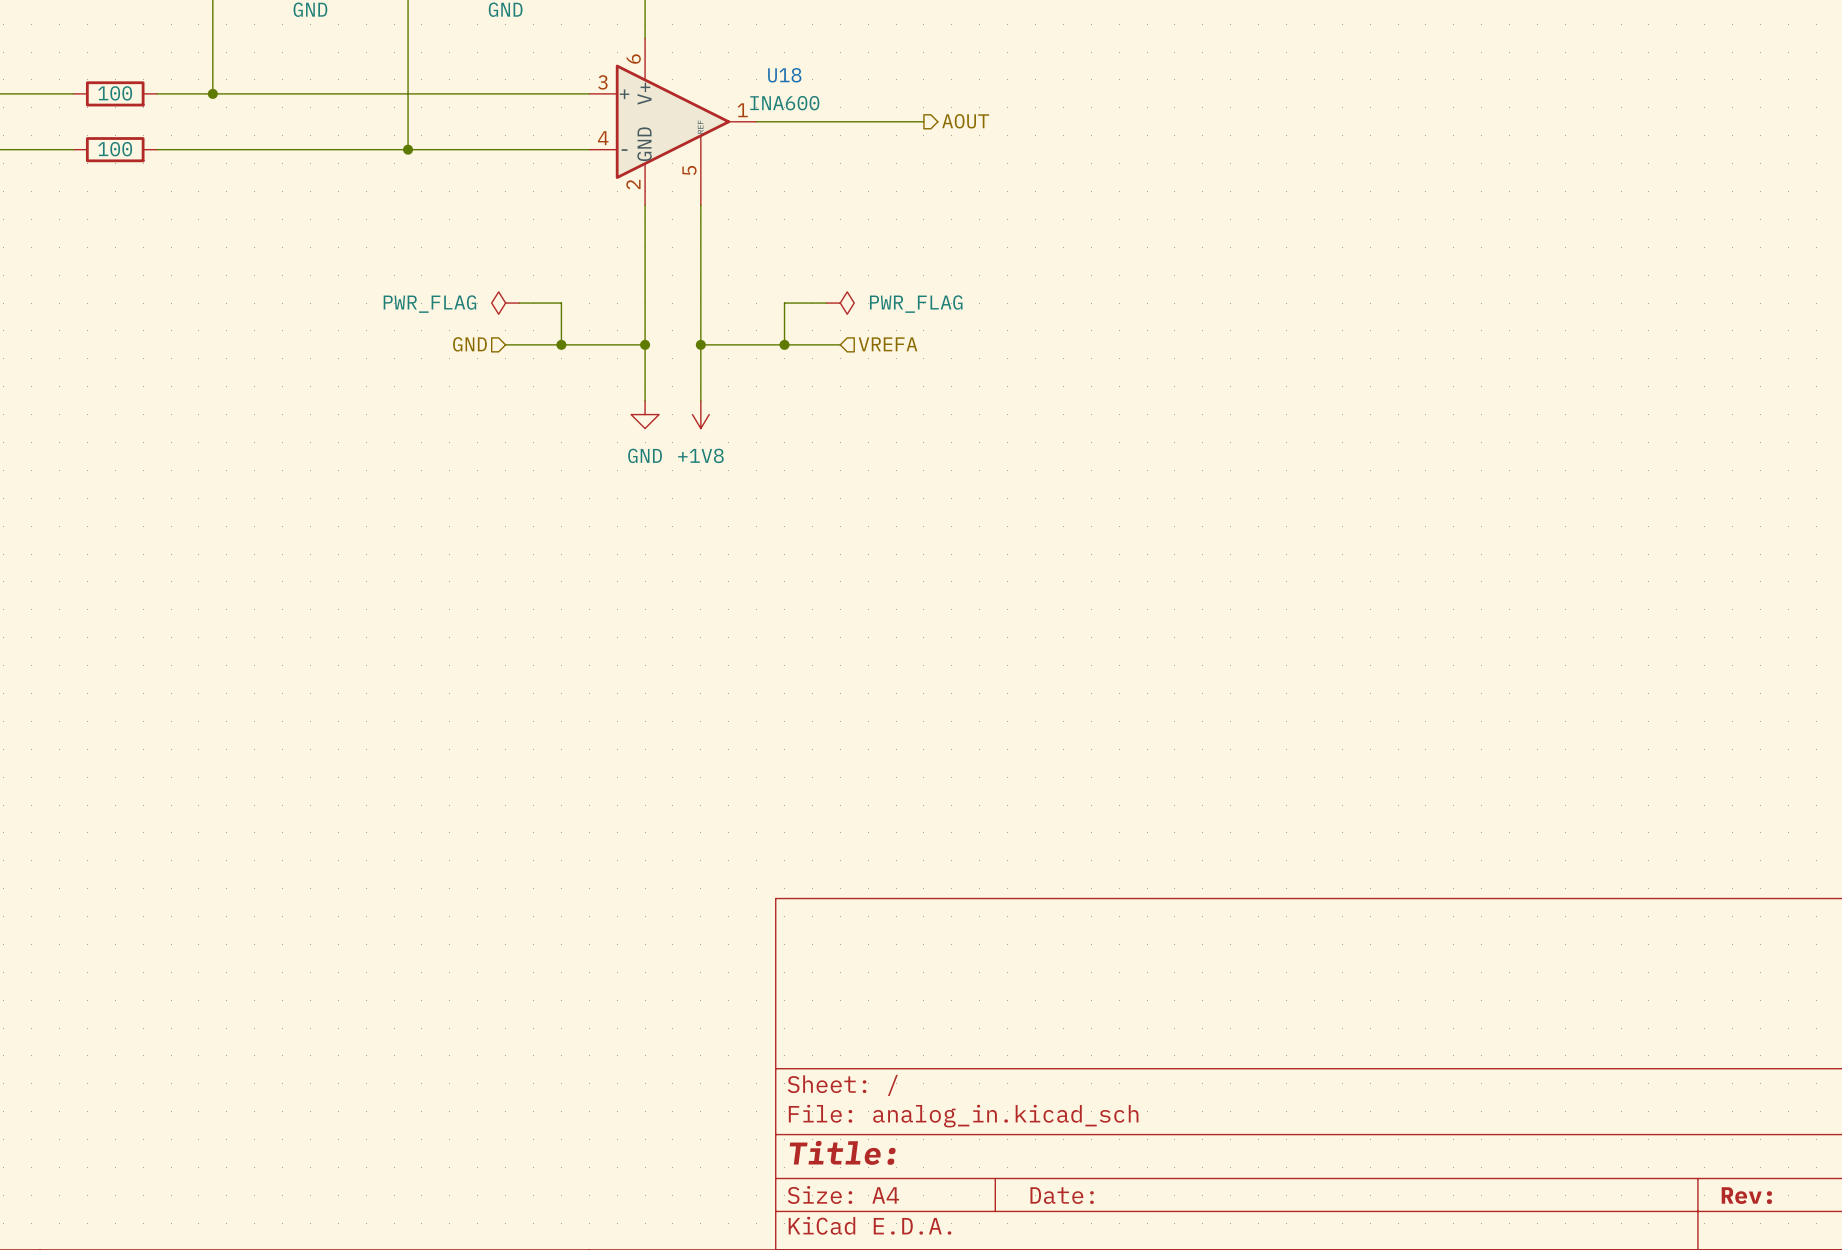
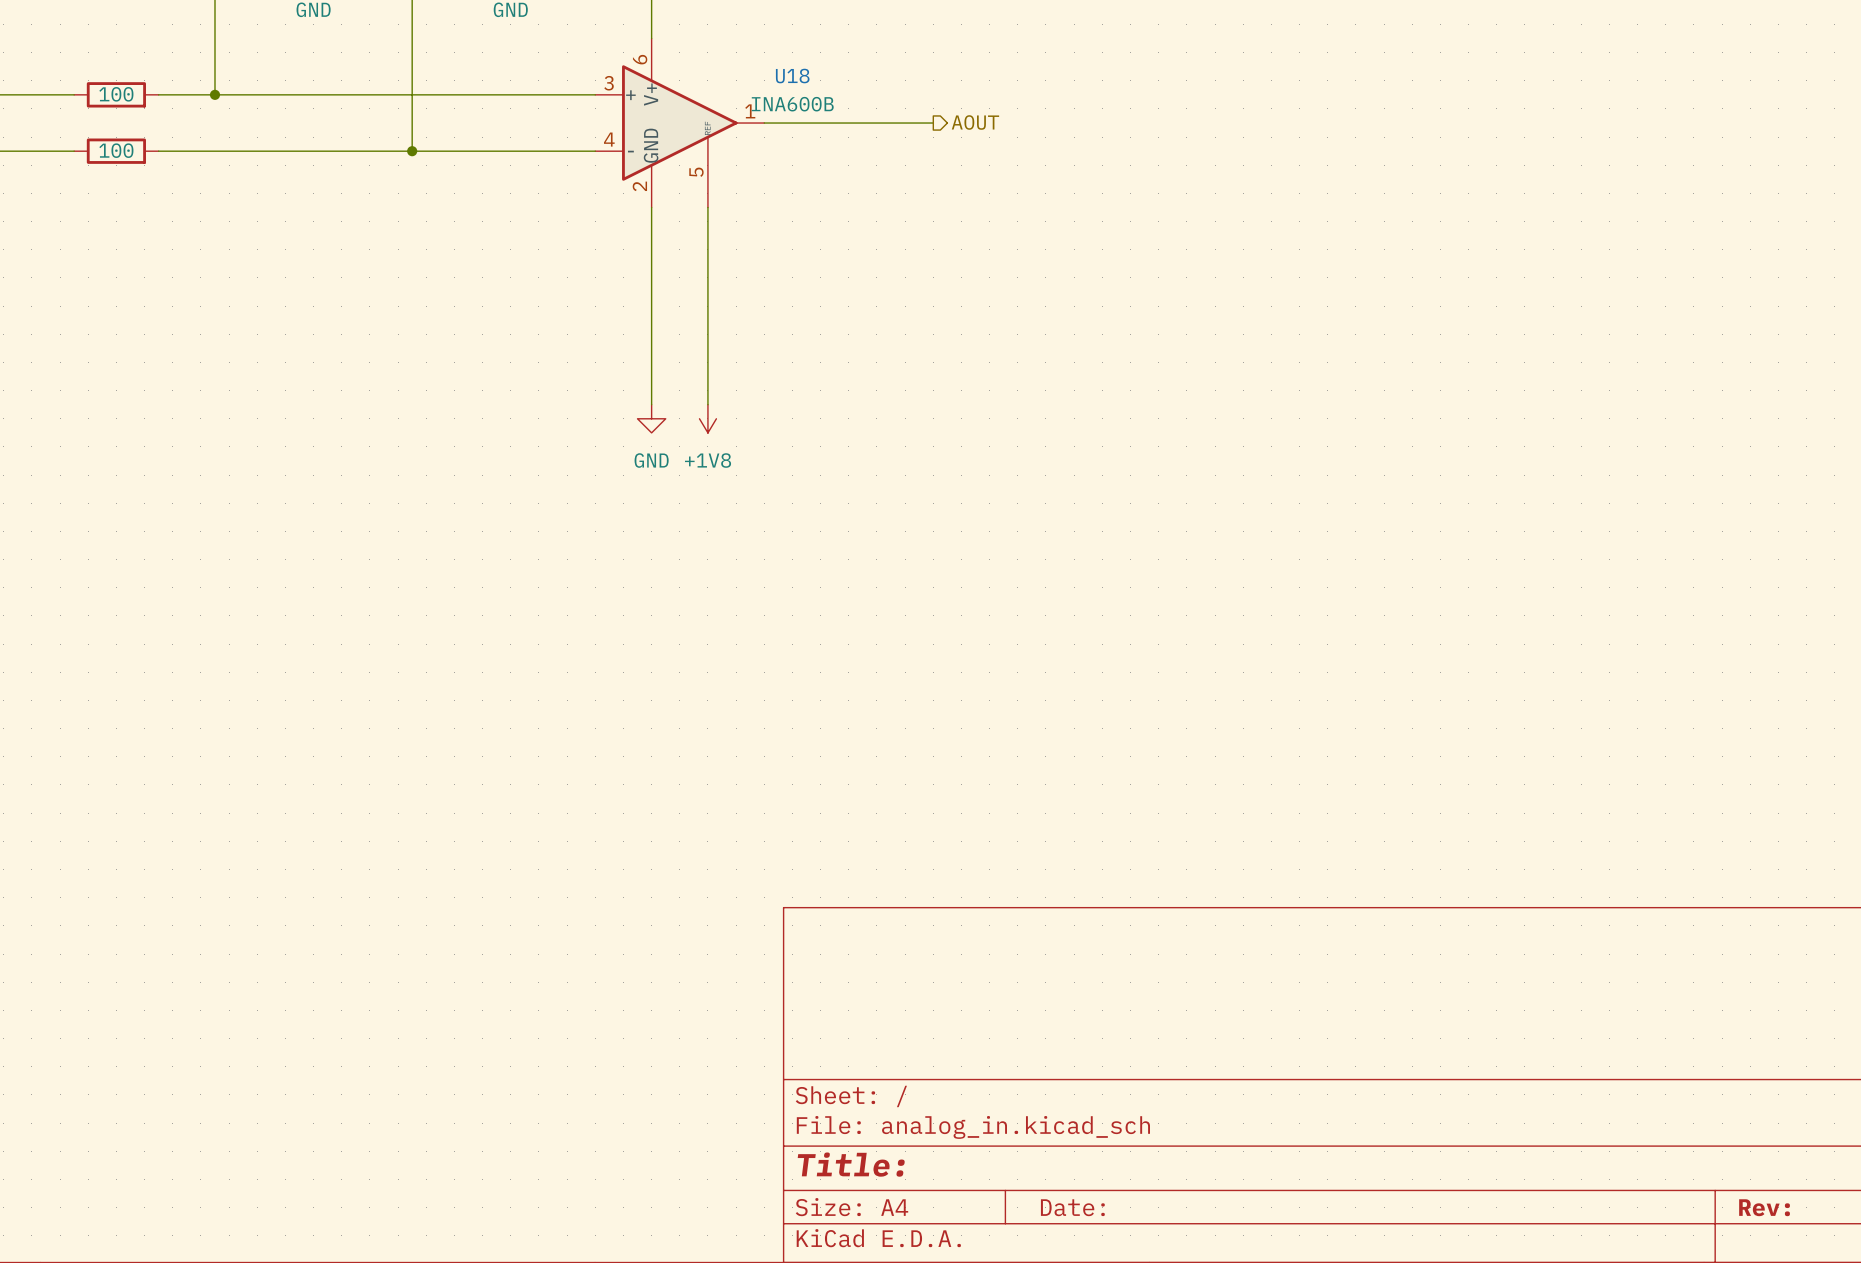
U18 value: INA600 (784, 103) -> INA600B (792, 104)
power symbol: PWR_FLAG (505, 303) -> none
wire: (519, 303) (561, 303) (561, 344) -> none
wire: (826, 303) (784, 303) (784, 344) -> none
power symbol: PWR_FLAG (840, 303) -> none
hierarchical label: GND (469, 344) -> none
wire: (505, 344) (645, 344) -> none
junction: (561, 344) -> none
junction: (645, 344) -> none
wire: (700, 344) (840, 344) -> none
junction: (700, 344) -> none
junction: (784, 344) -> none
hierarchical label: VREFA (888, 344) -> none

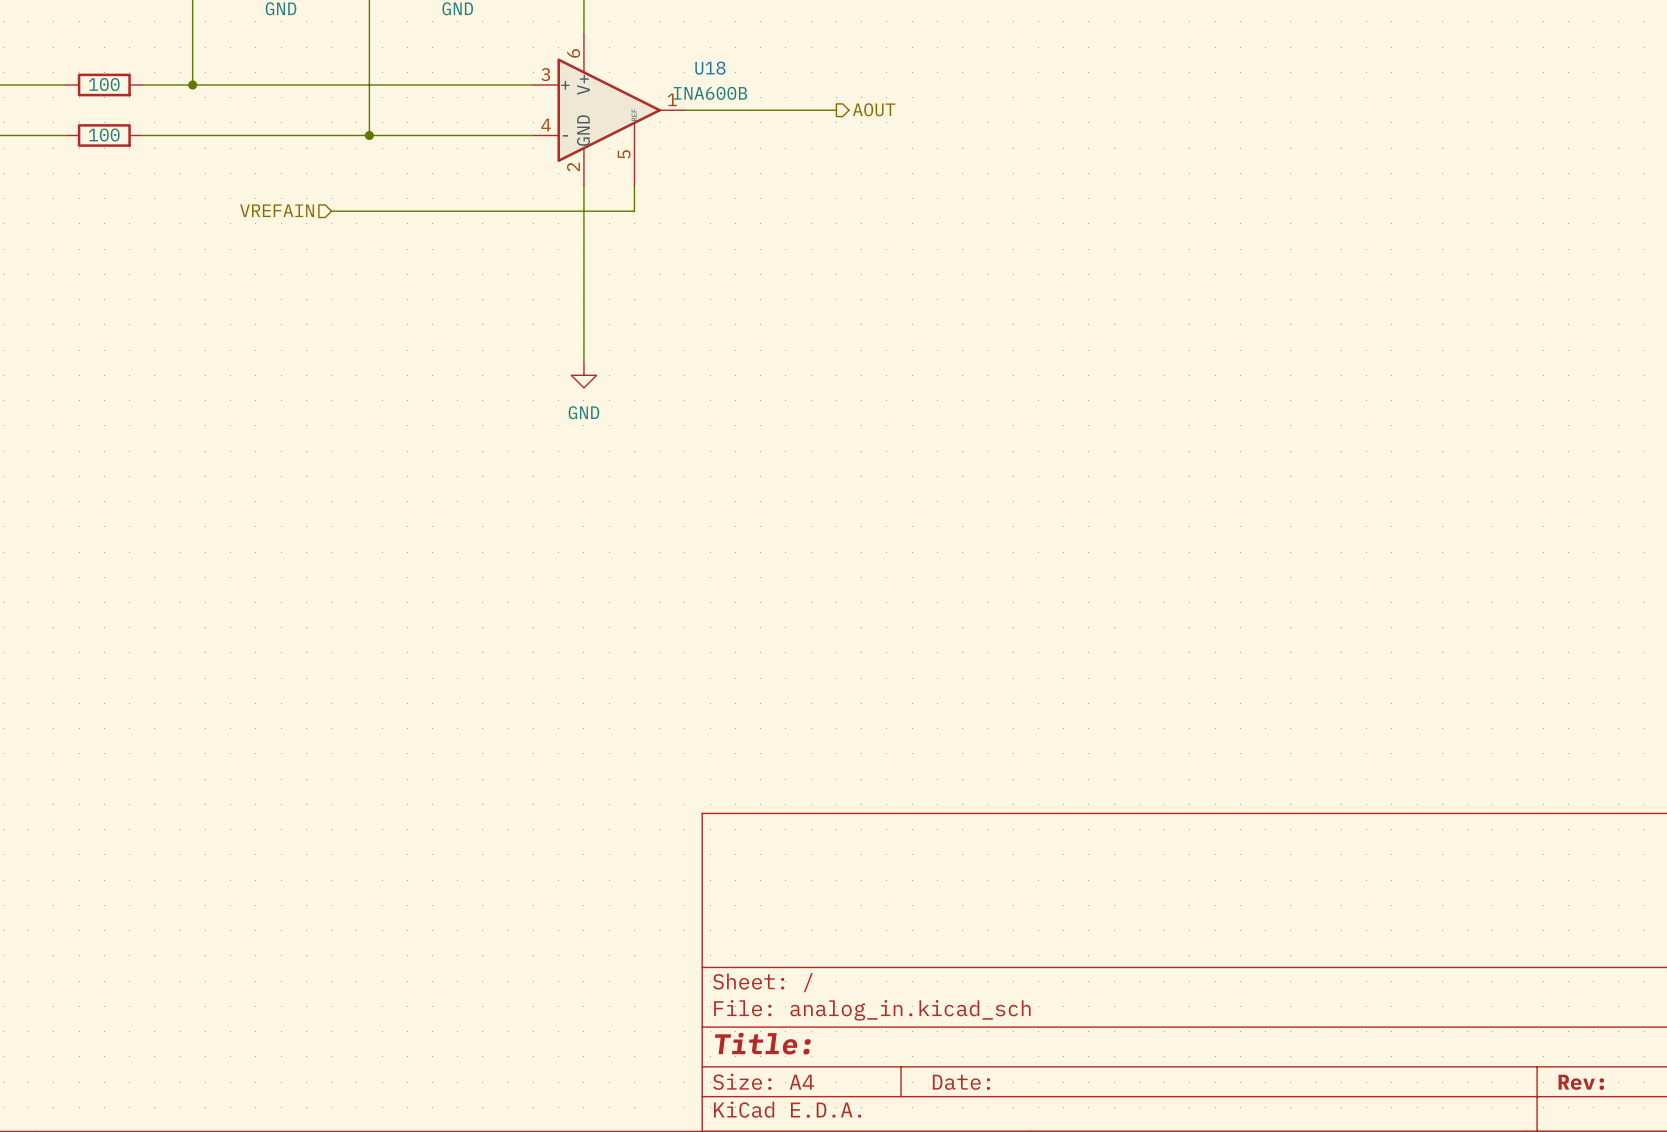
hierarchical label: none -> VREFAIN (277, 210)
wire: (707, 235) (707, 404) -> (634, 211) (331, 211)
power symbol: +1V8 (707, 418) -> none

